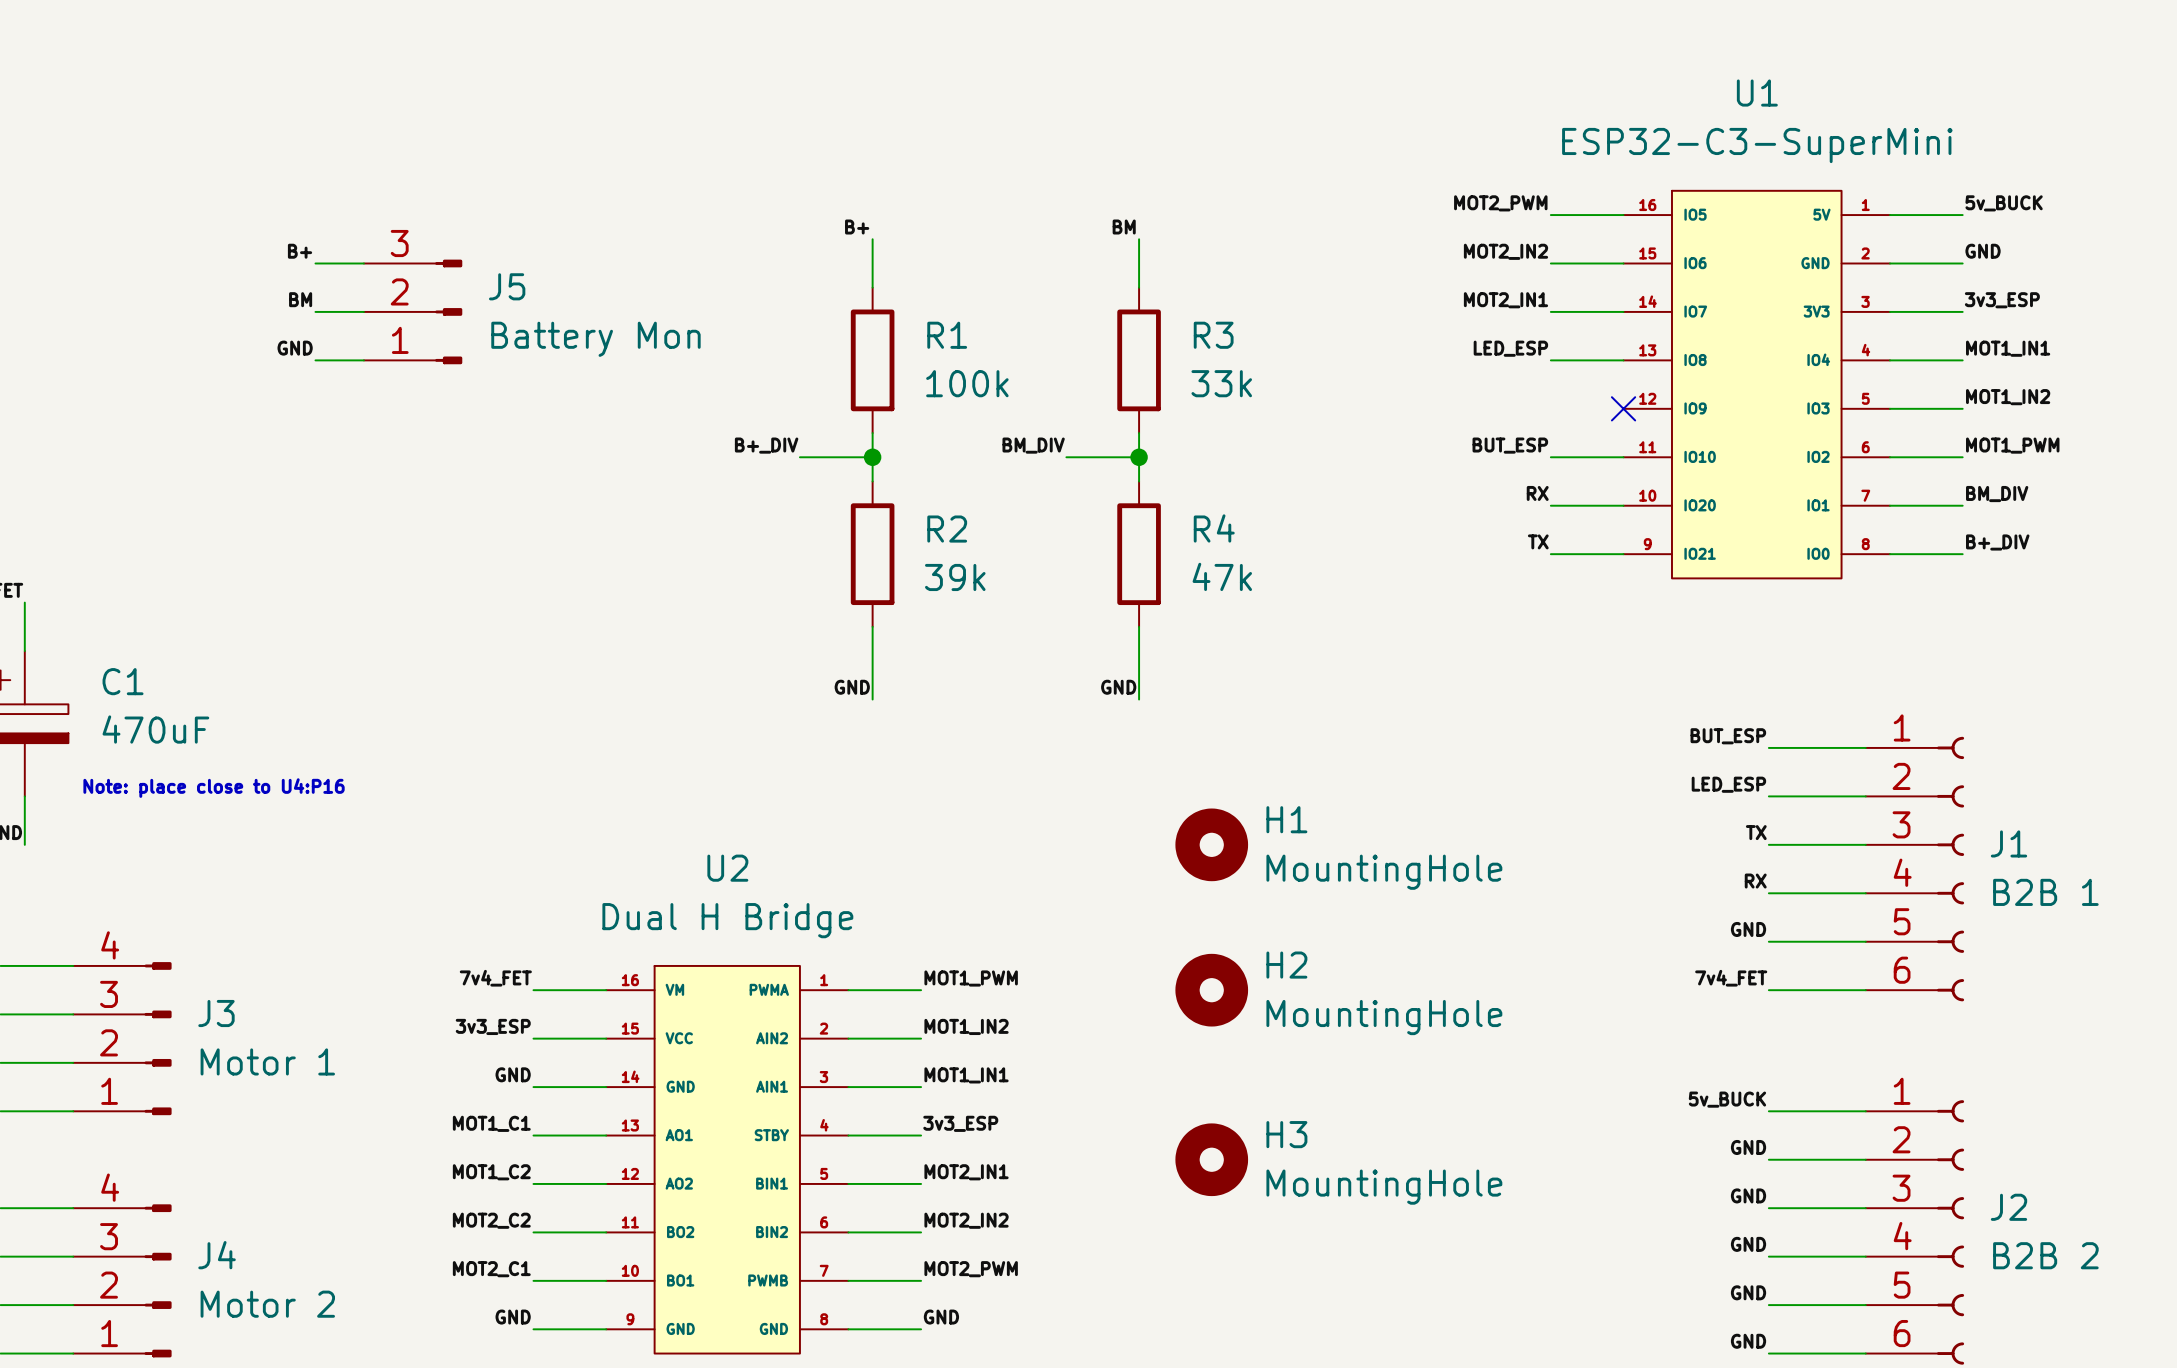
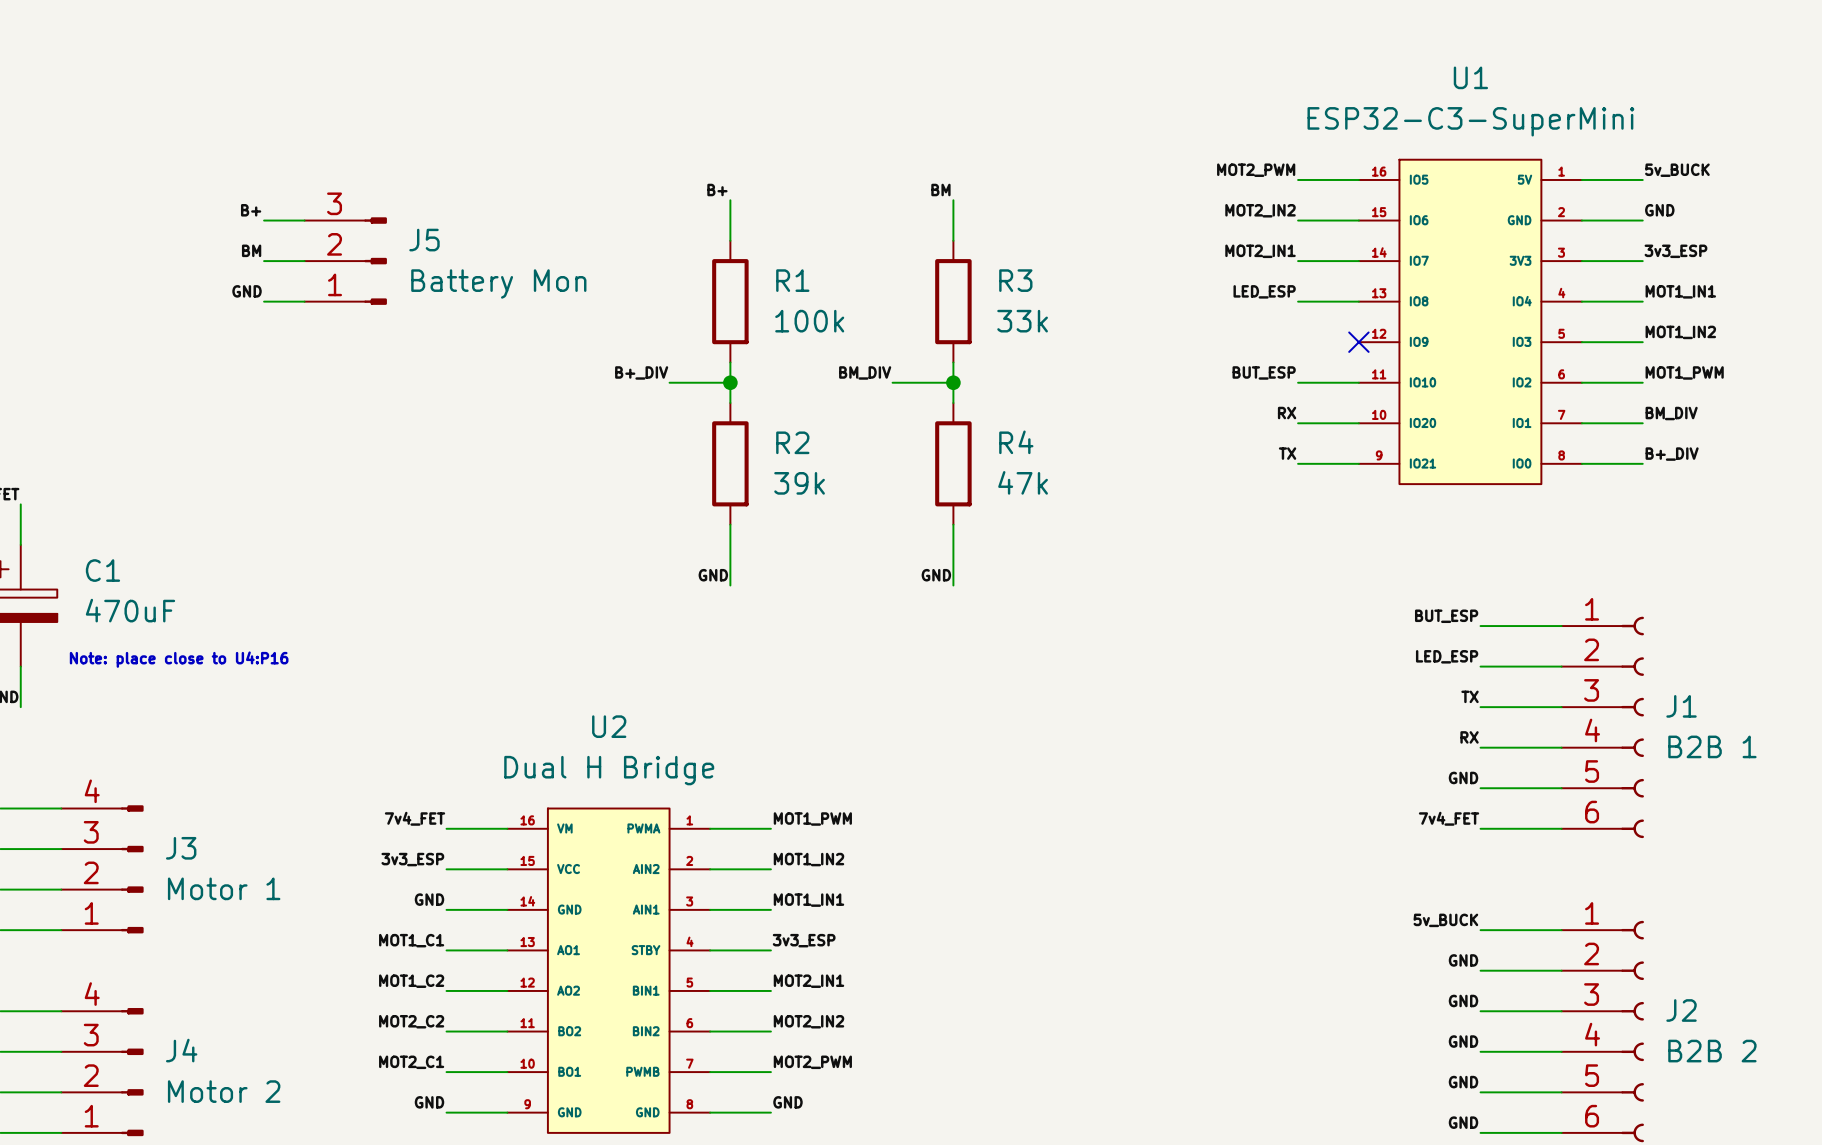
H1: MountingHole (1211, 844) -> none
H2: MountingHole (1211, 990) -> none
H3: MountingHole (1211, 1159) -> none

